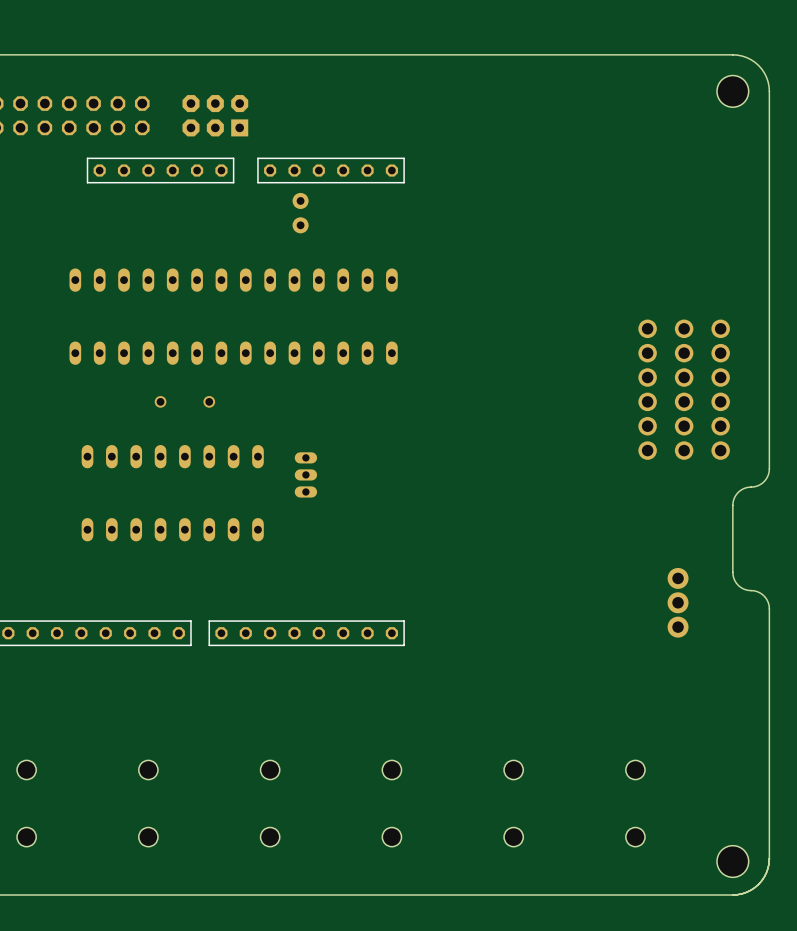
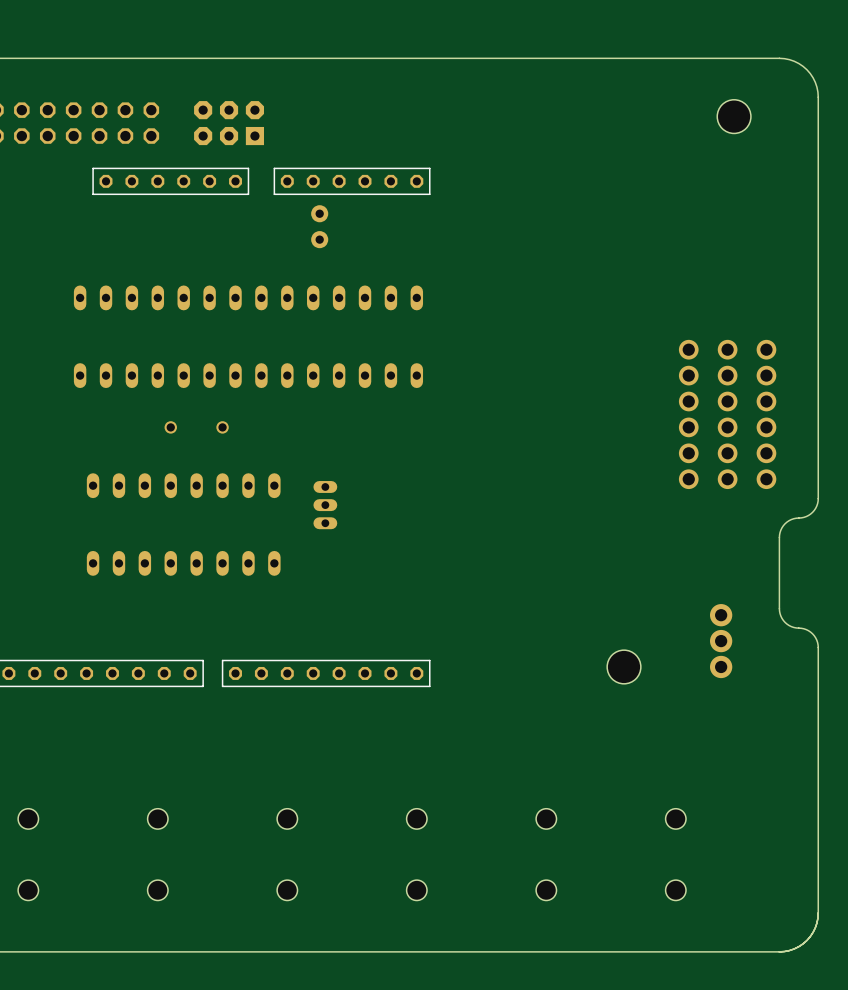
part position: (732, 91) -> (734, 116)
part: none -> (624, 666)
part: (732, 861) -> none

